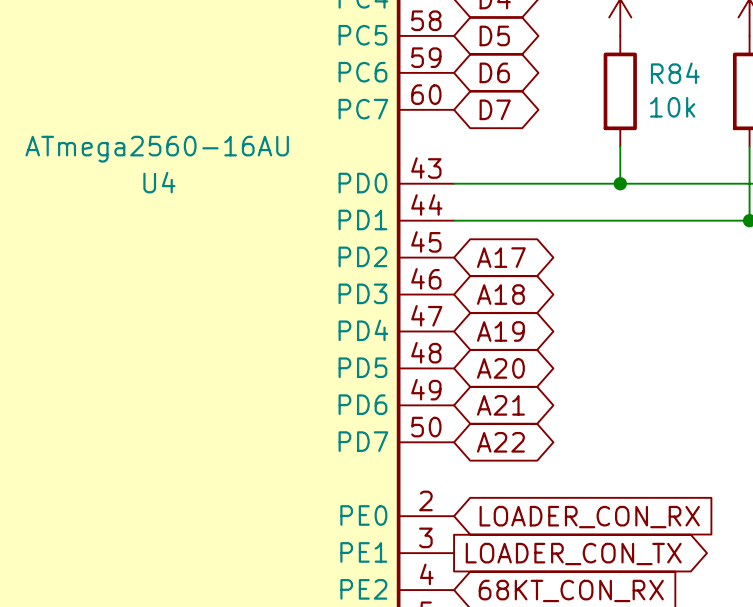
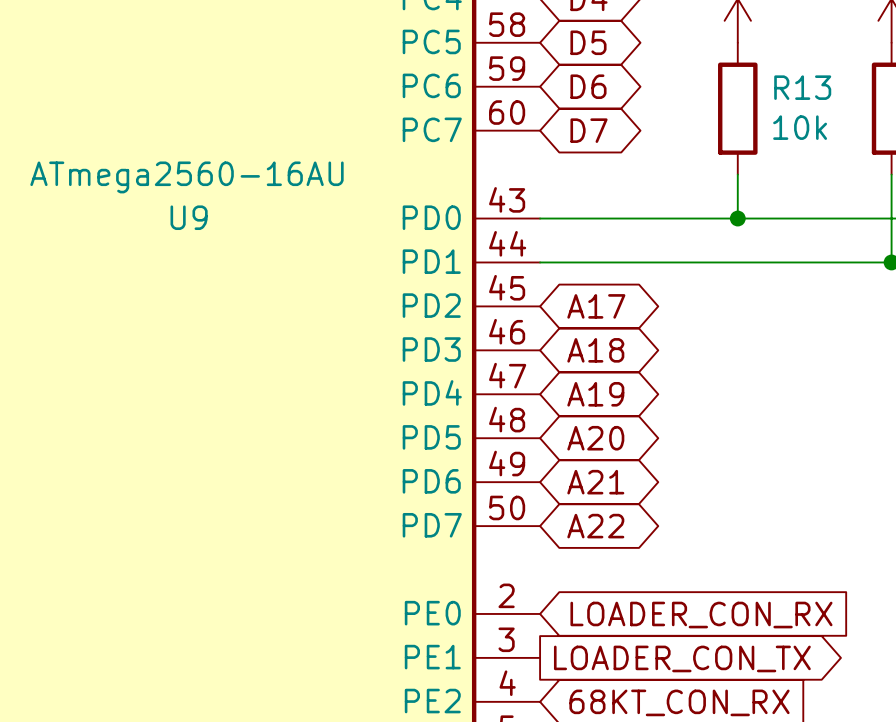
R84 name: R84 (675, 73) -> R13 (802, 87)
U4 name: U4 (159, 182) -> U9 (189, 217)

